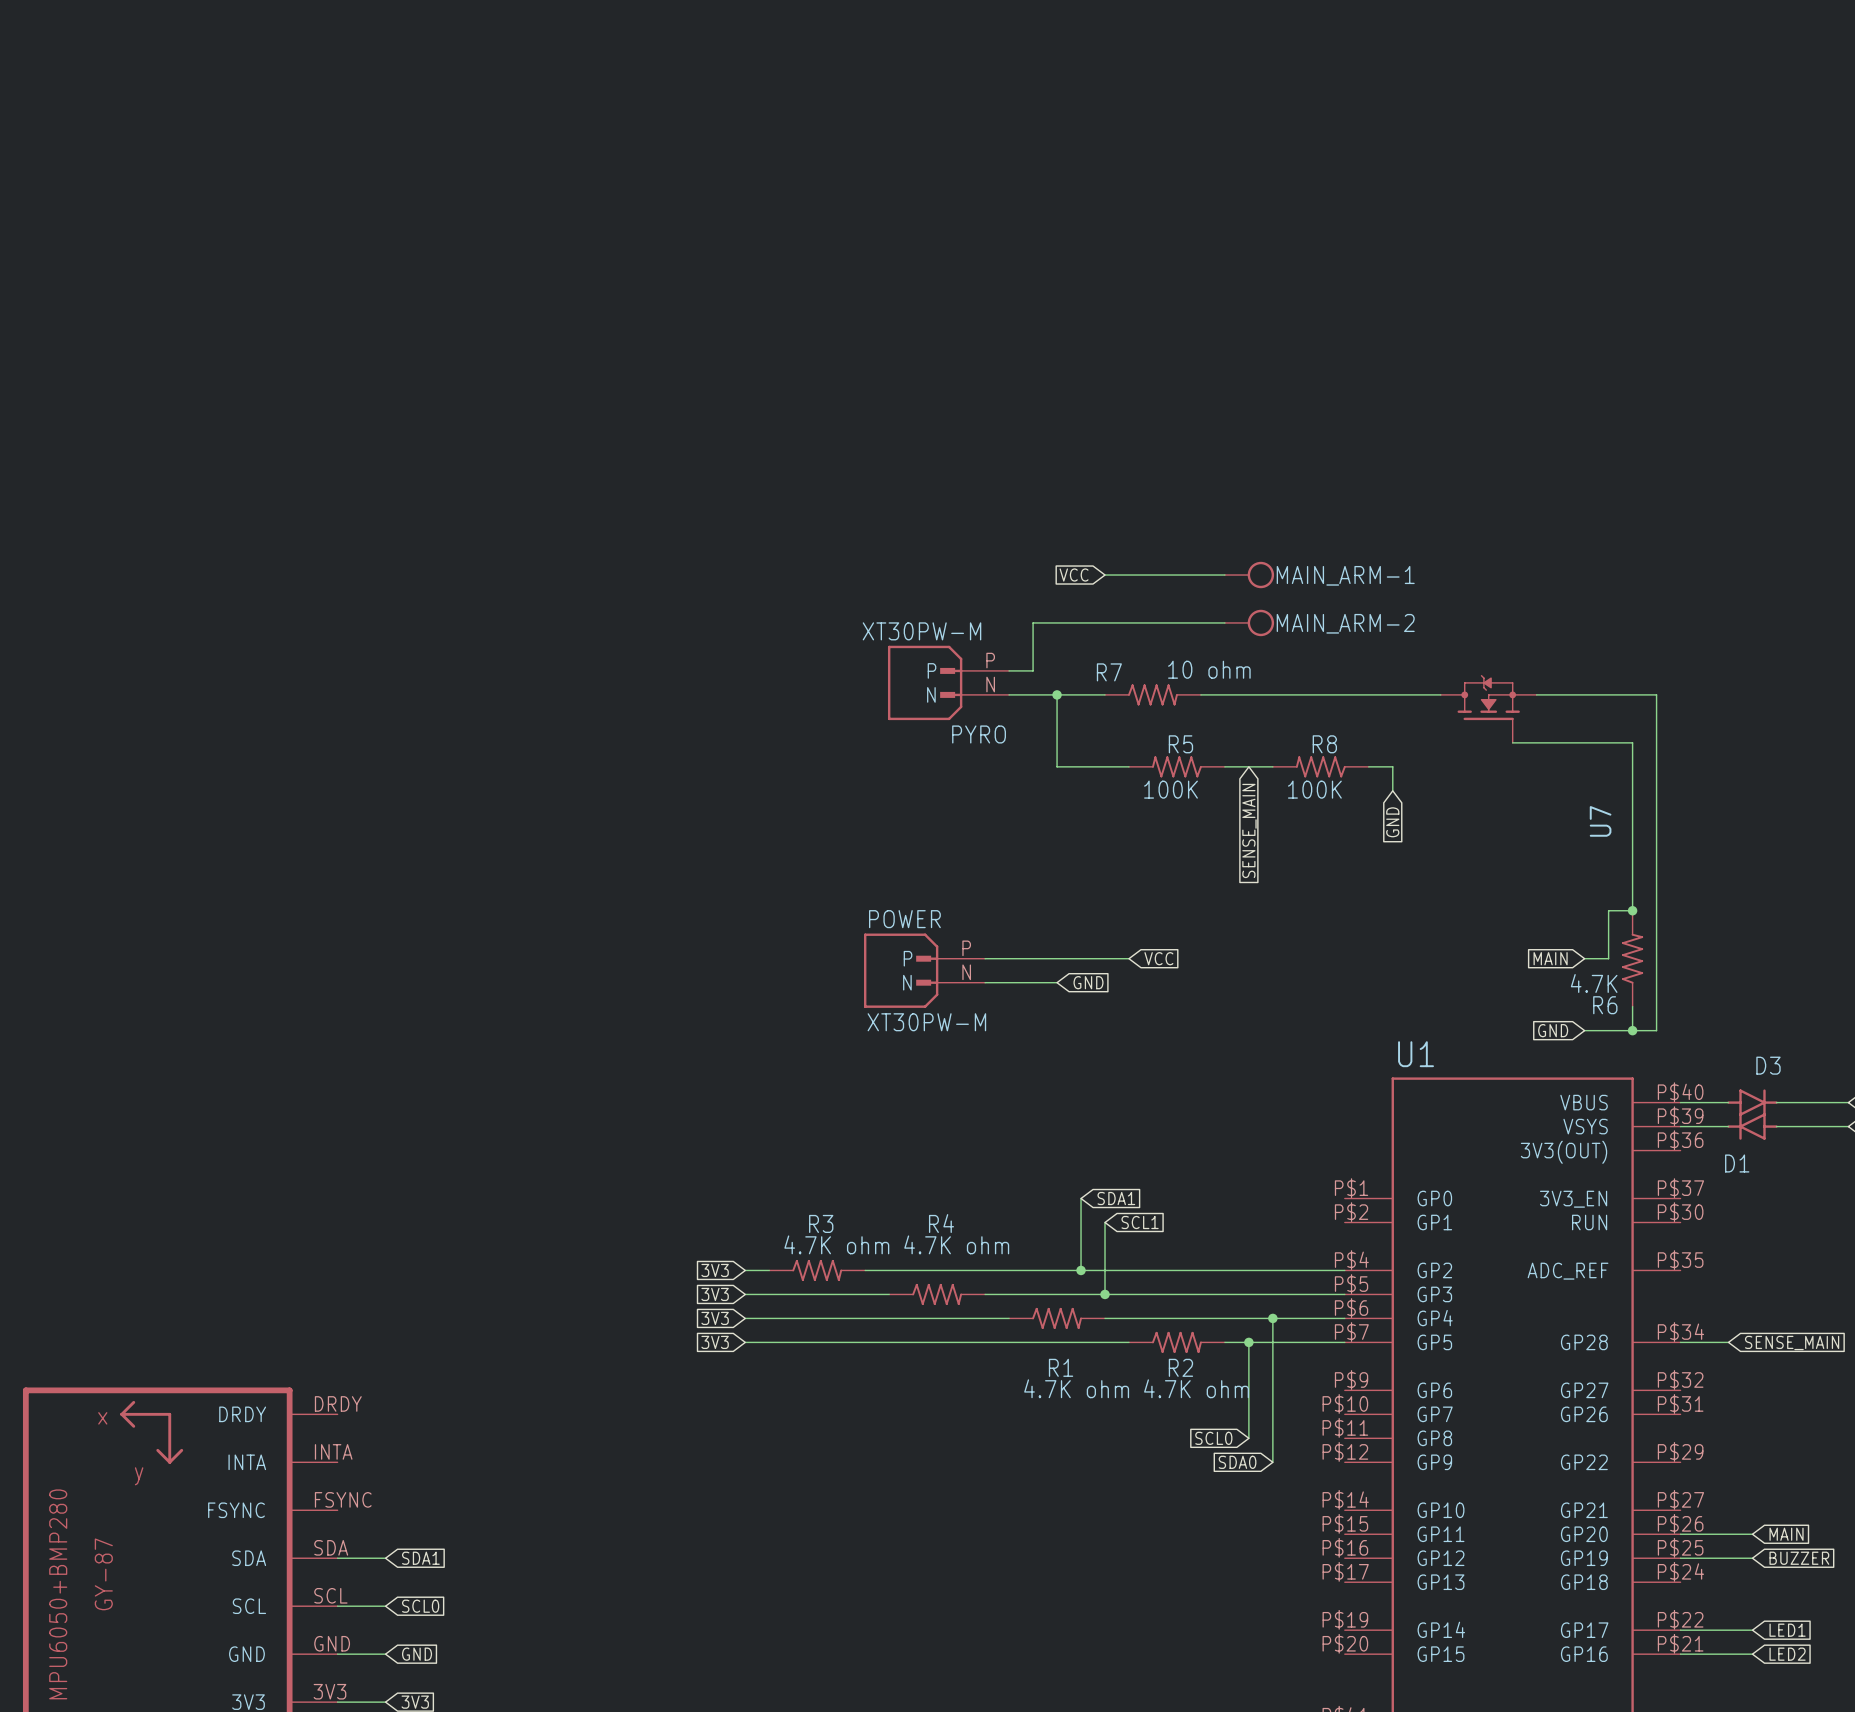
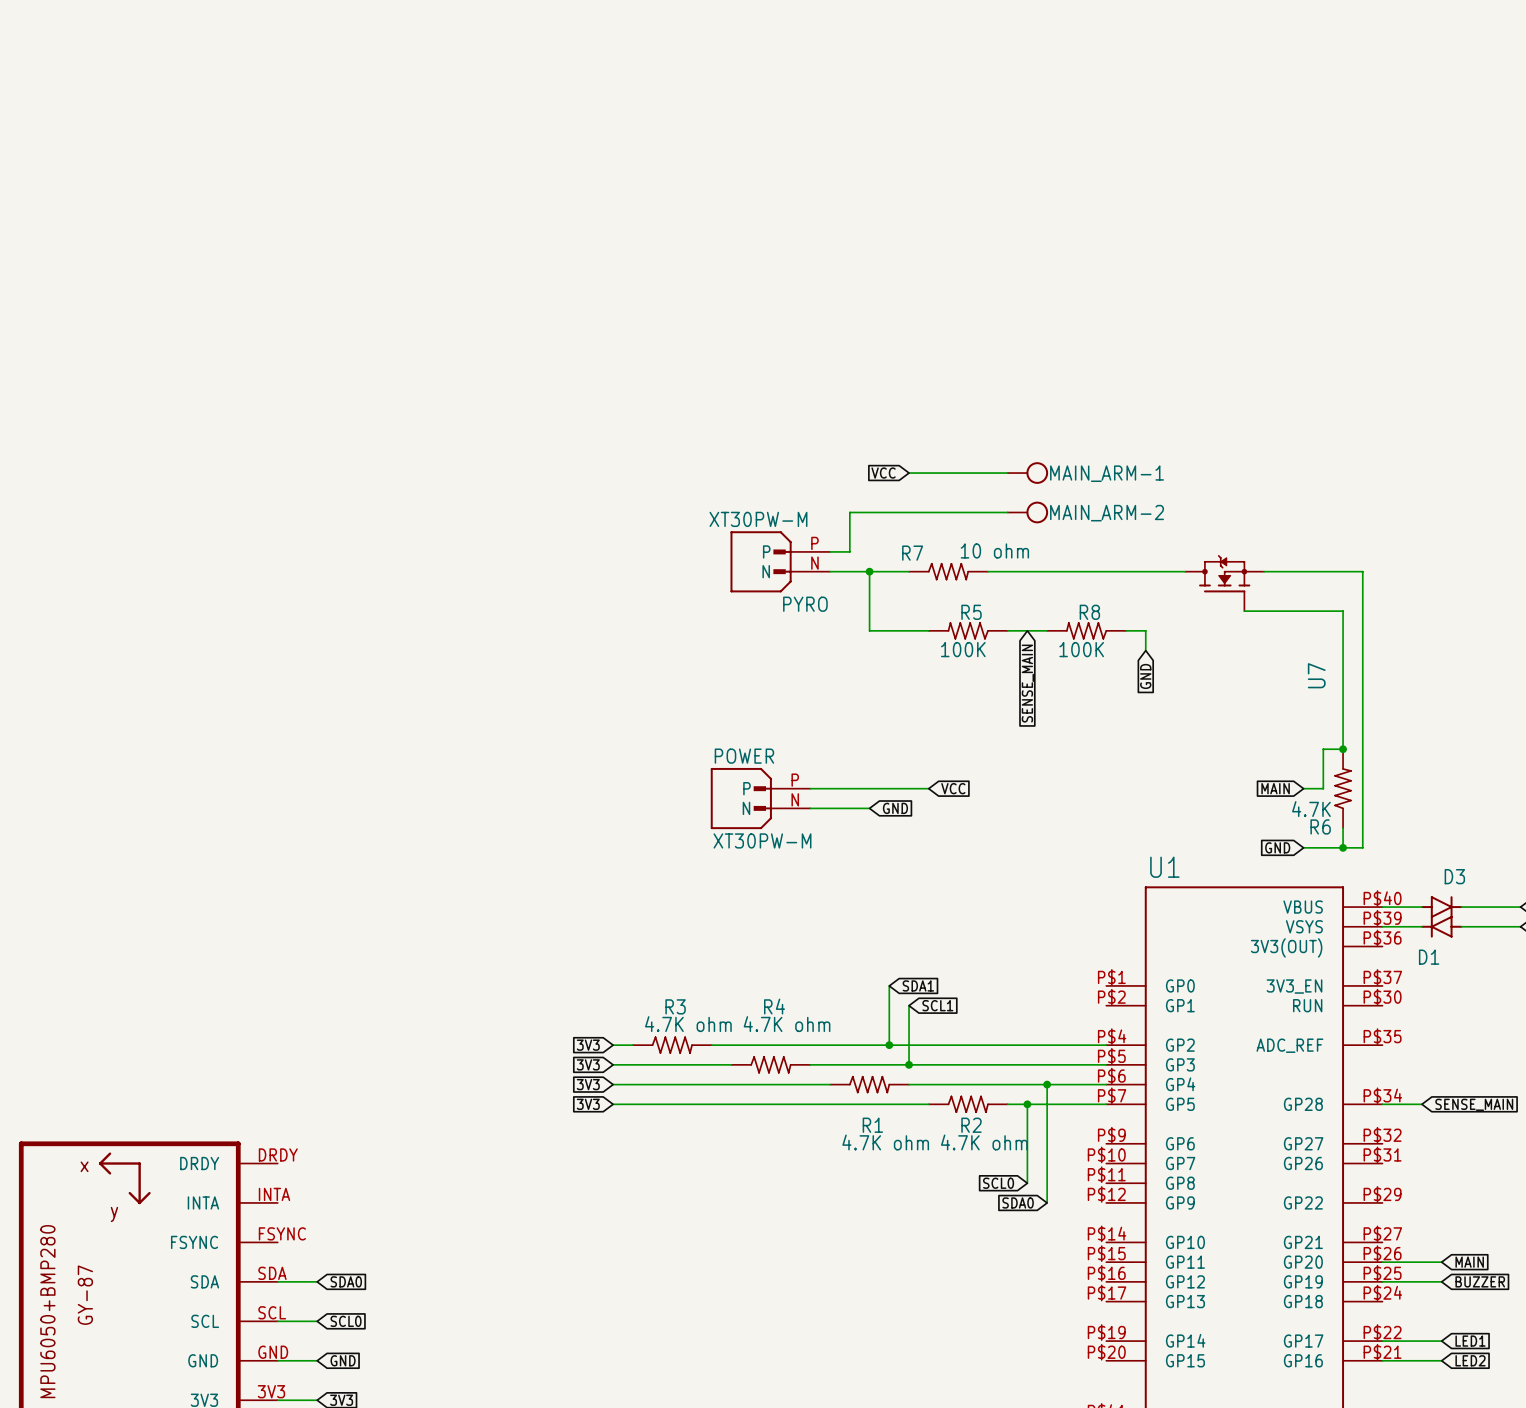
global label: SDA1 (420, 1558) -> SDA0 (346, 1281)

